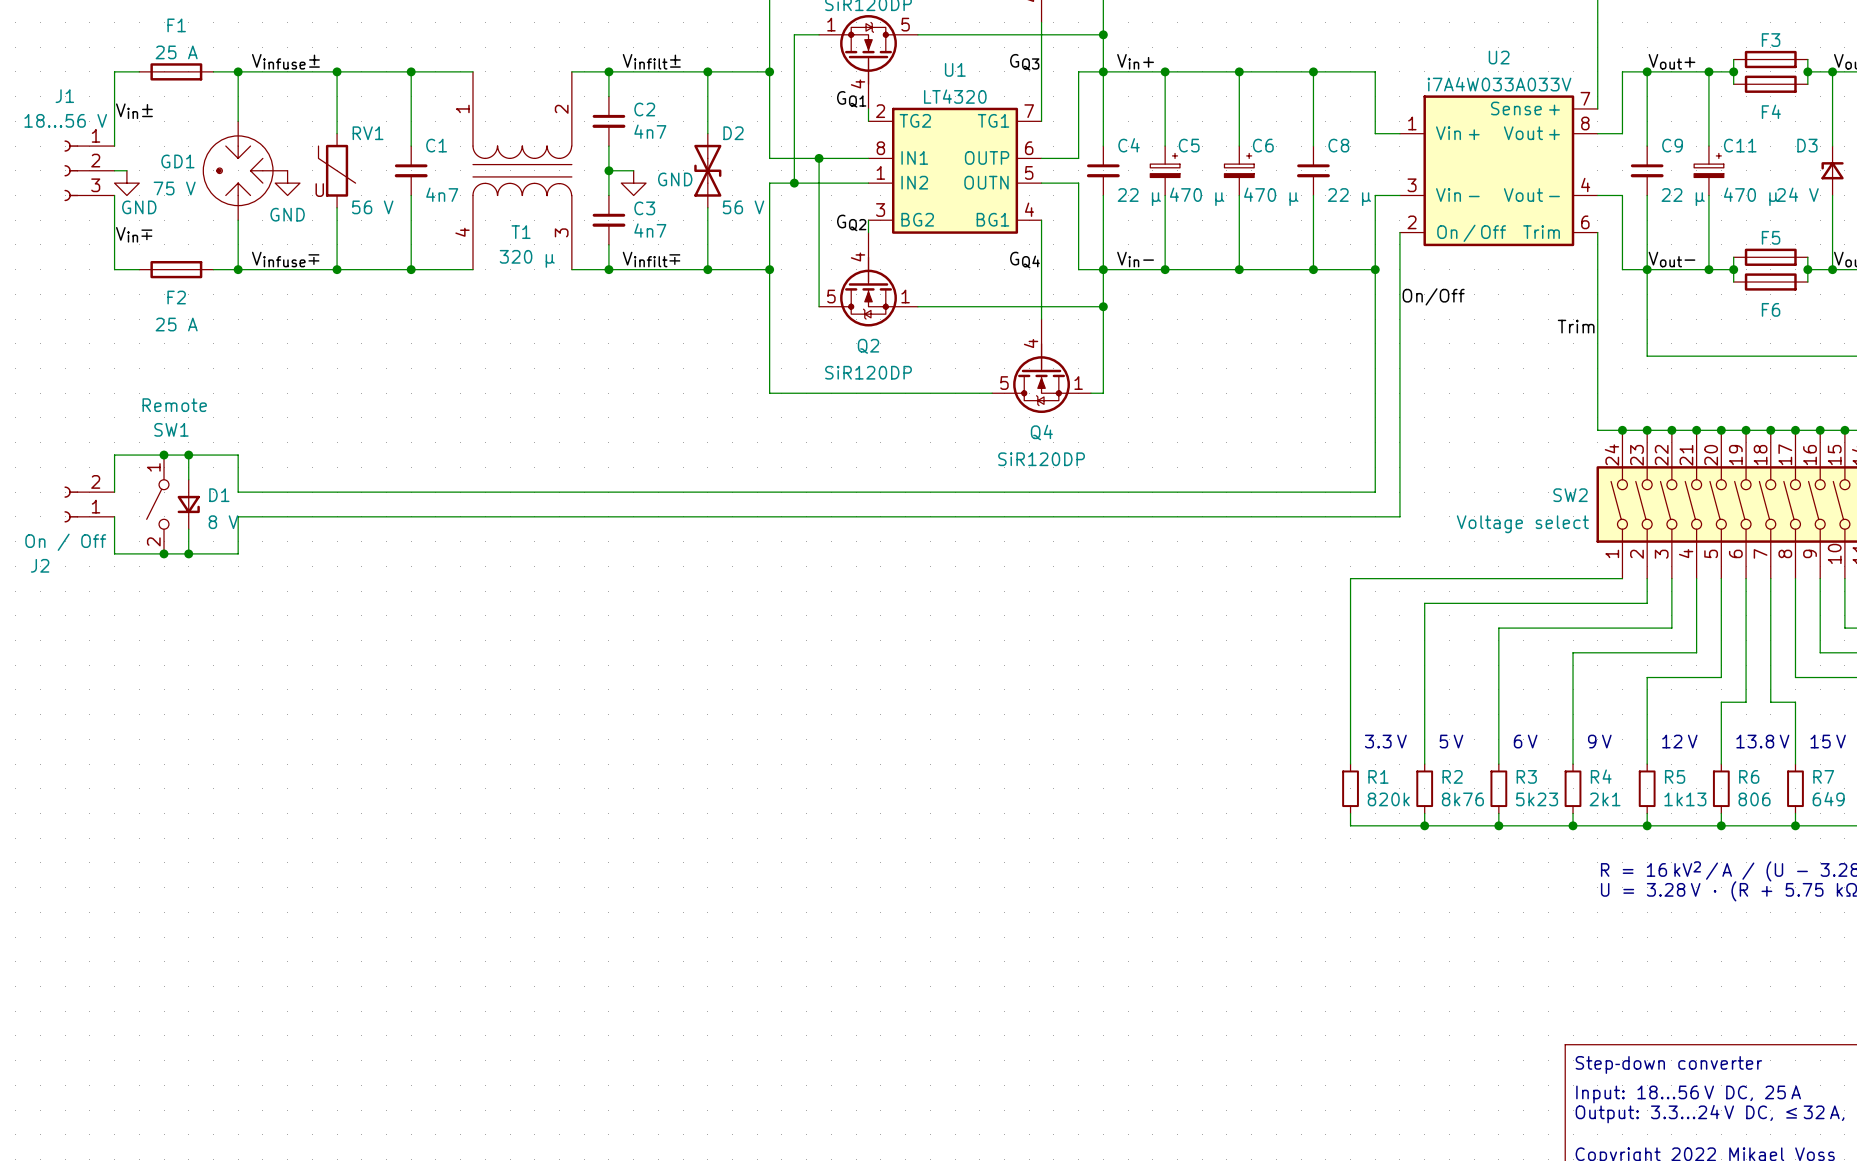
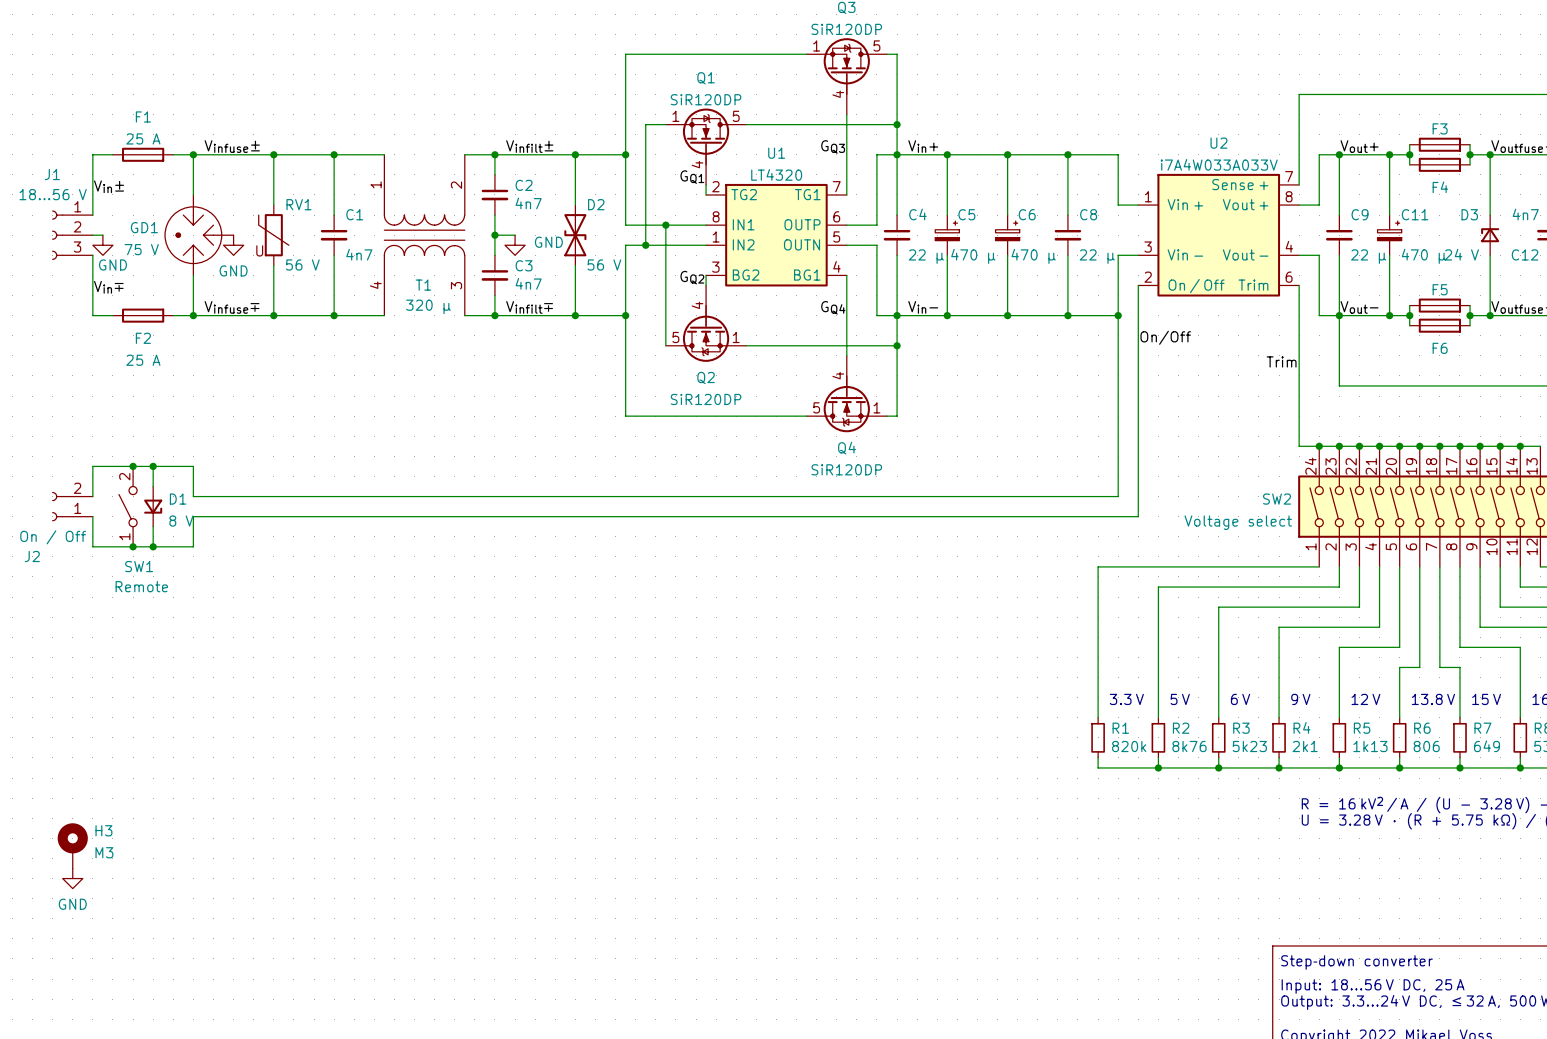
SW1 flip: as is (157, 504) -> up-down (128, 506)
H3: none -> M3 (72, 845)
power symbol: none -> GND (72, 878)

